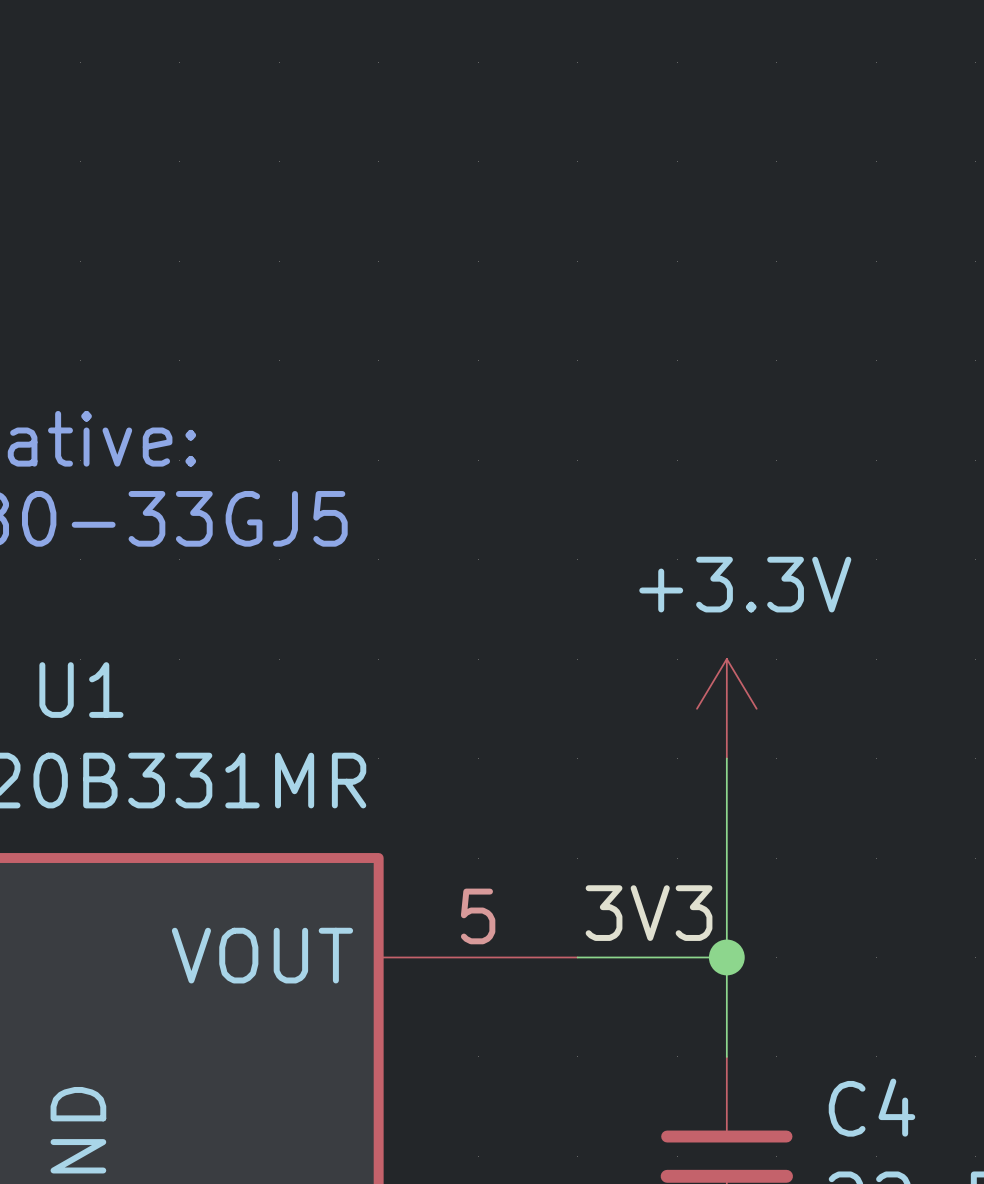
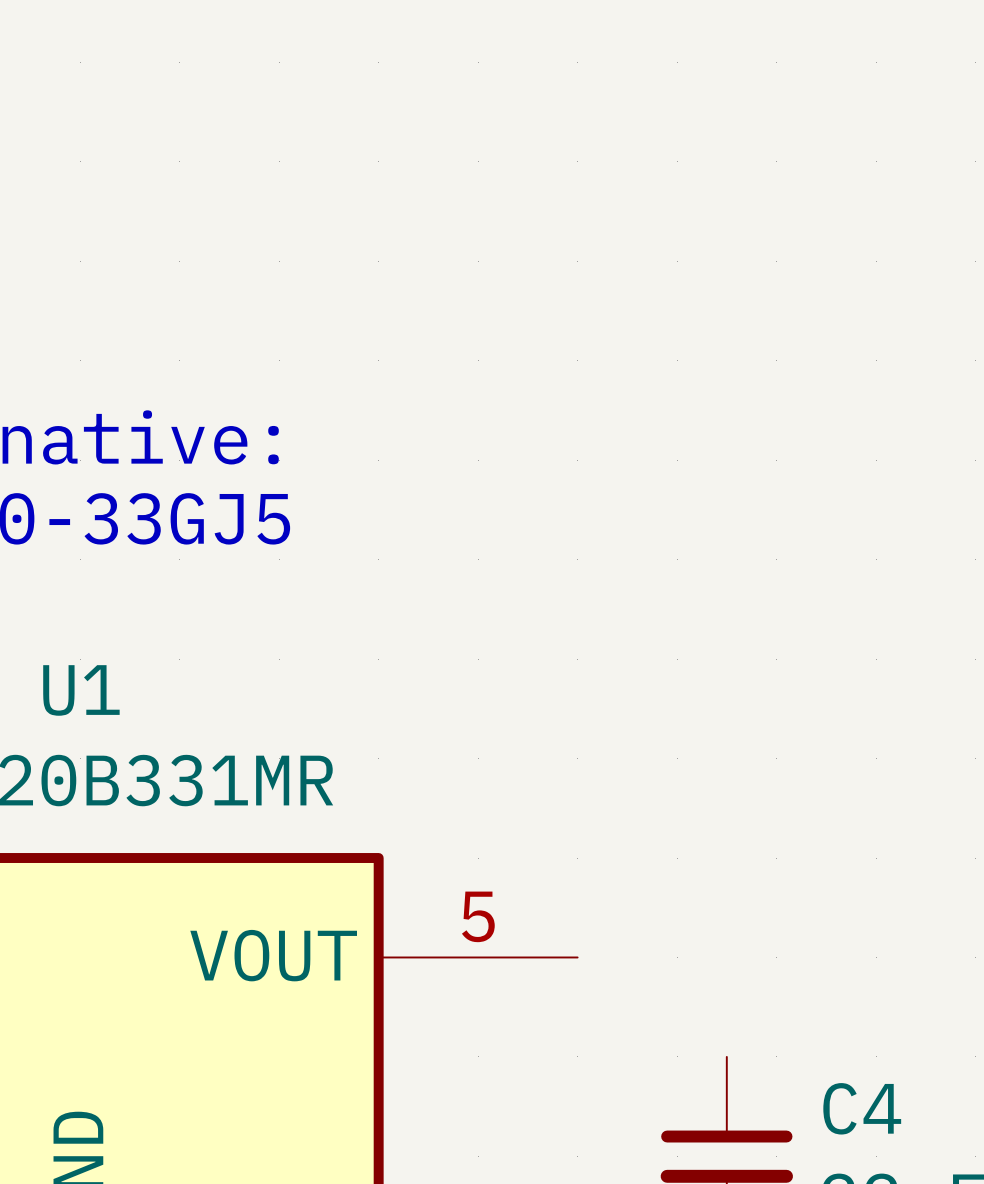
power symbol: +3.3V (726, 708) -> none
wire: (726, 758) (726, 1056) -> none
label: 3V3 (649, 913) -> none
wire: (577, 957) (726, 957) -> none
junction: (726, 957) -> none

